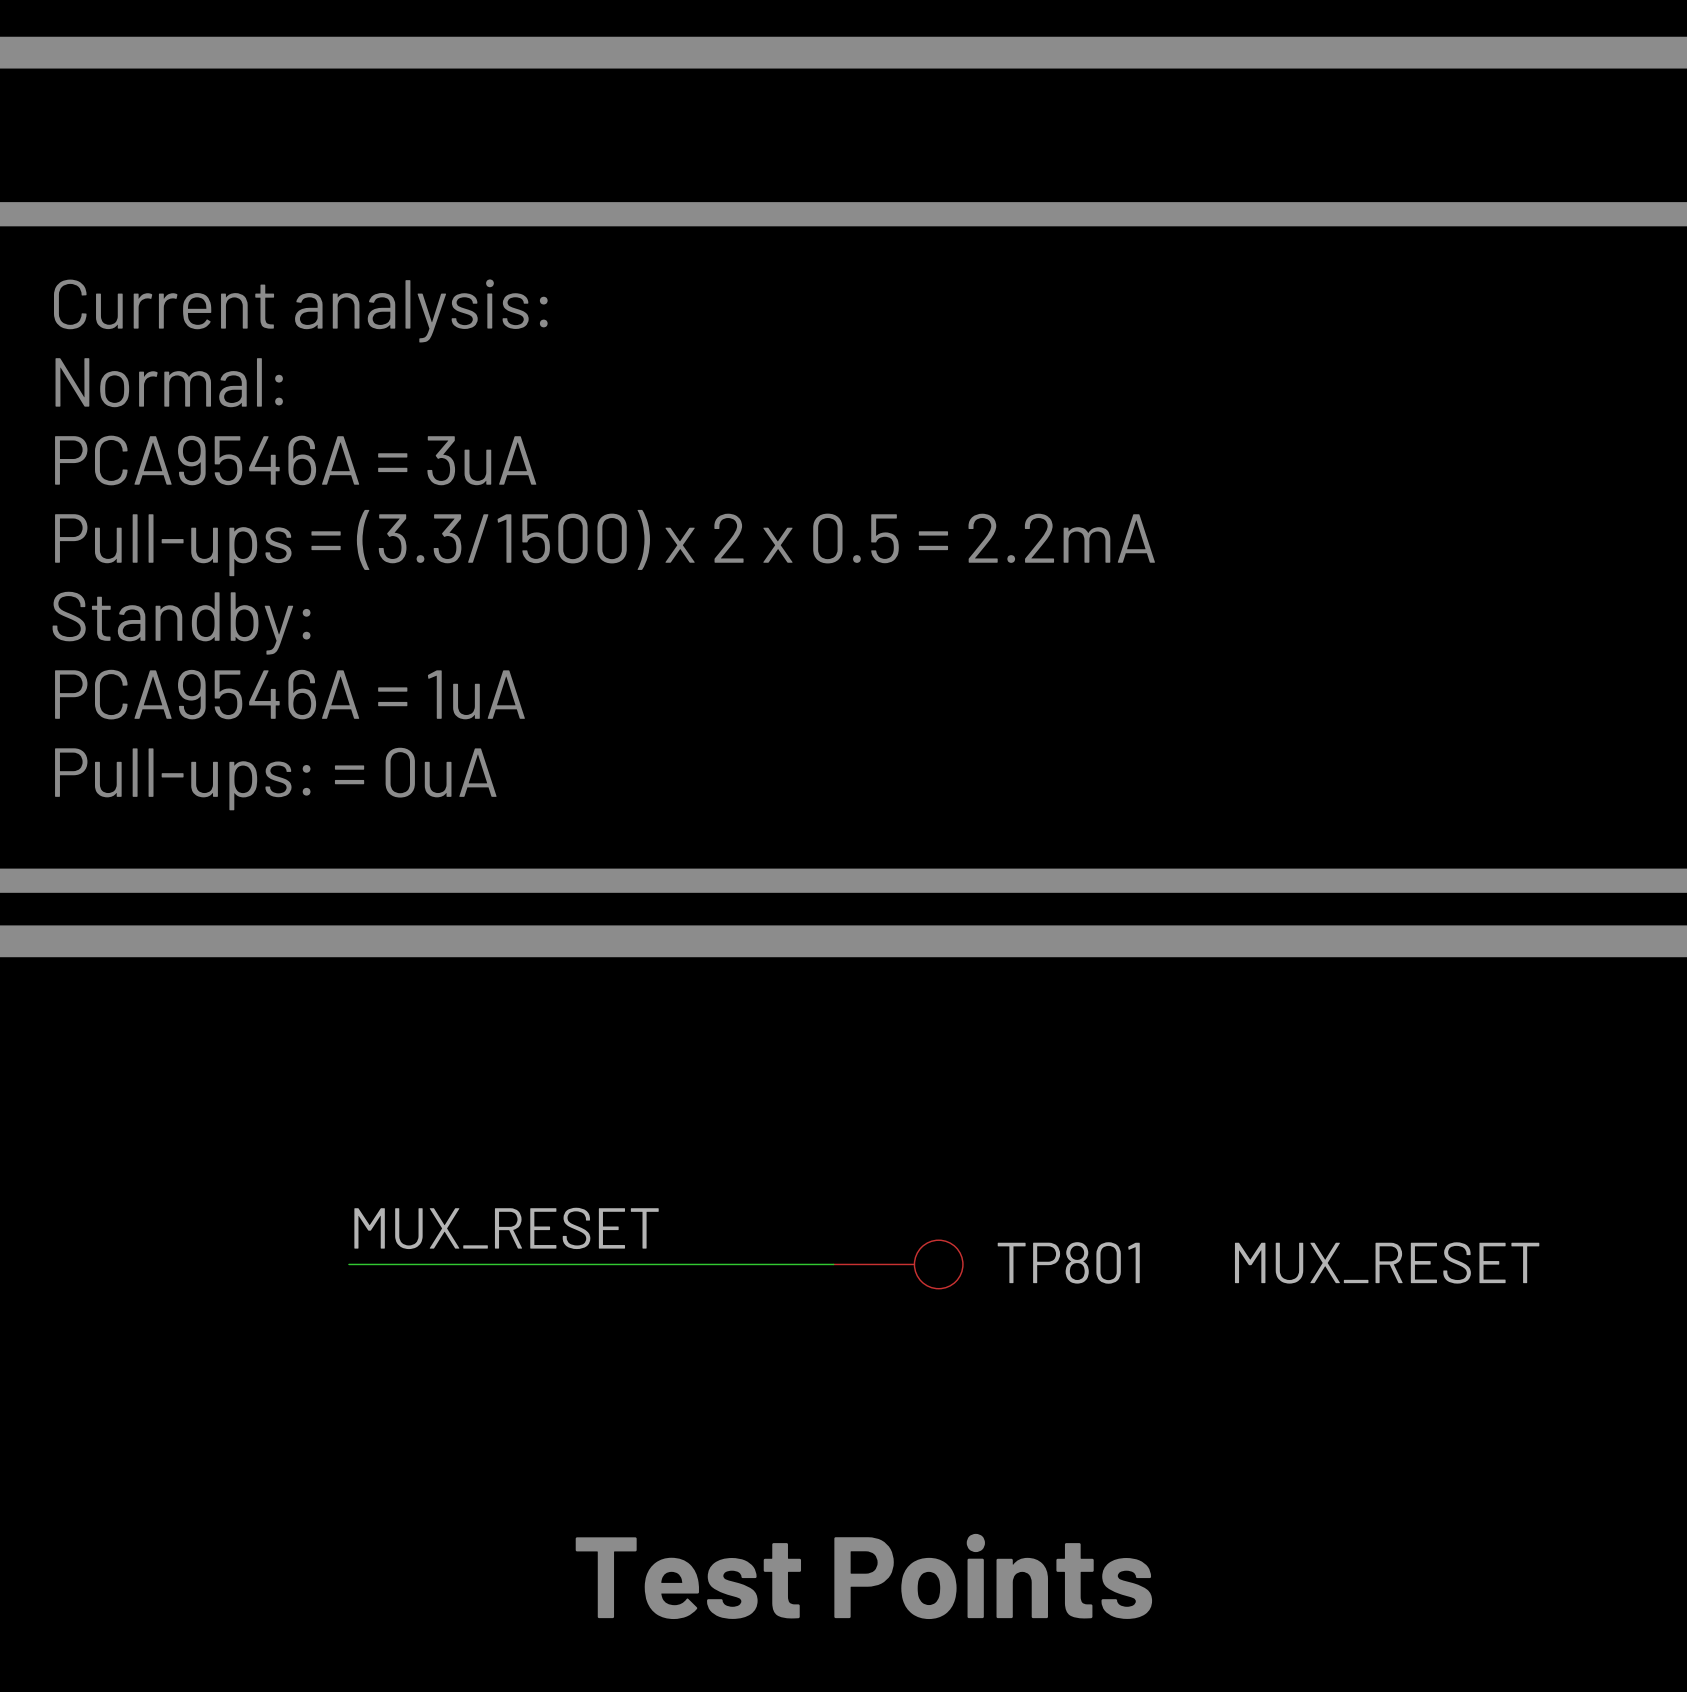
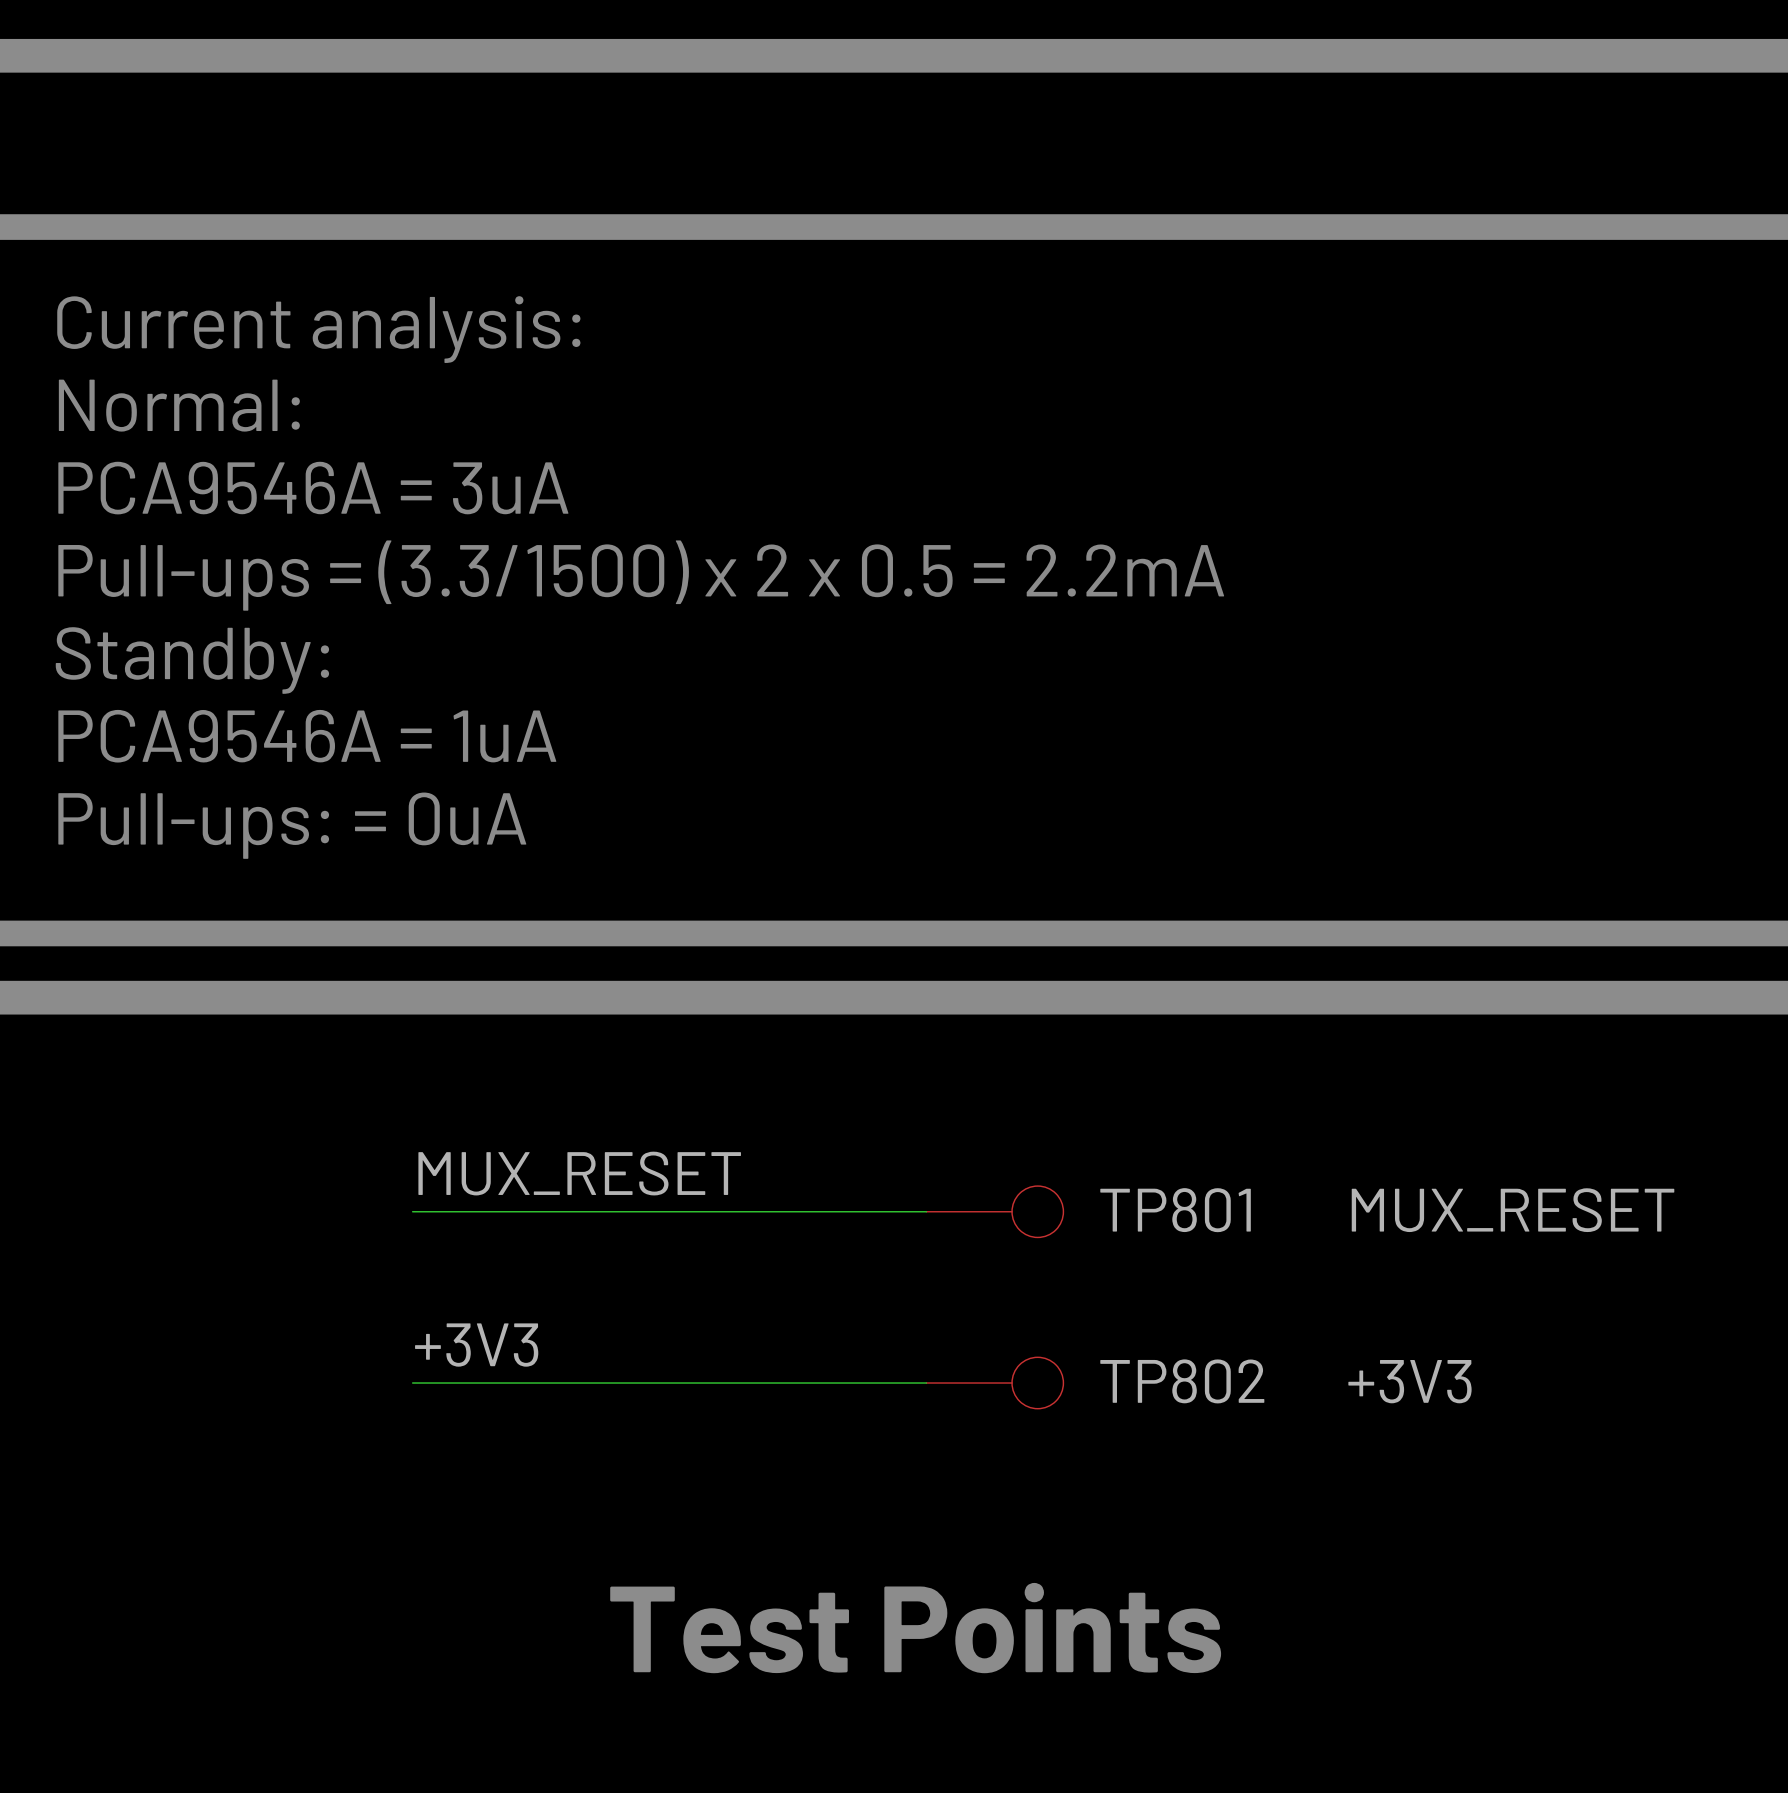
wire: none -> (412, 1211) (926, 1211)
label position: MUX_RESET (506, 1228) -> MUX_RESET (579, 1173)
wire: (348, 1264) (833, 1264) -> (412, 1383) (926, 1383)
TP801 position: (898, 1264) -> (994, 1211)
label: none -> +3V3 (476, 1345)
TP802: none -> +3V3 (994, 1383)
text position: Test Points (863, 1576) -> Test Points (915, 1628)

